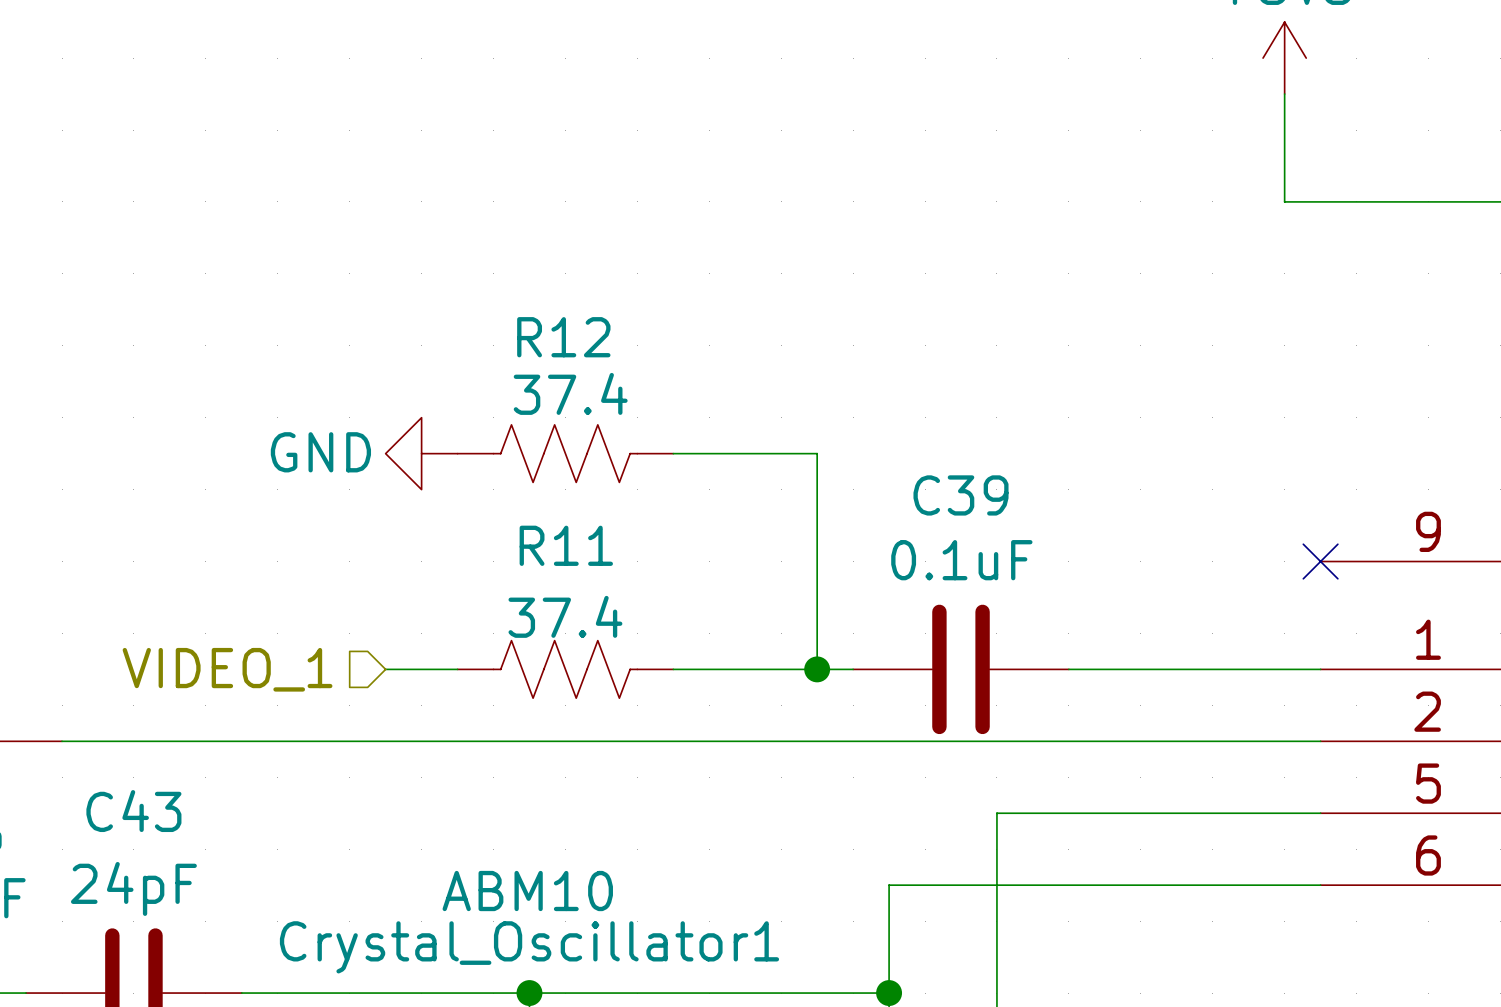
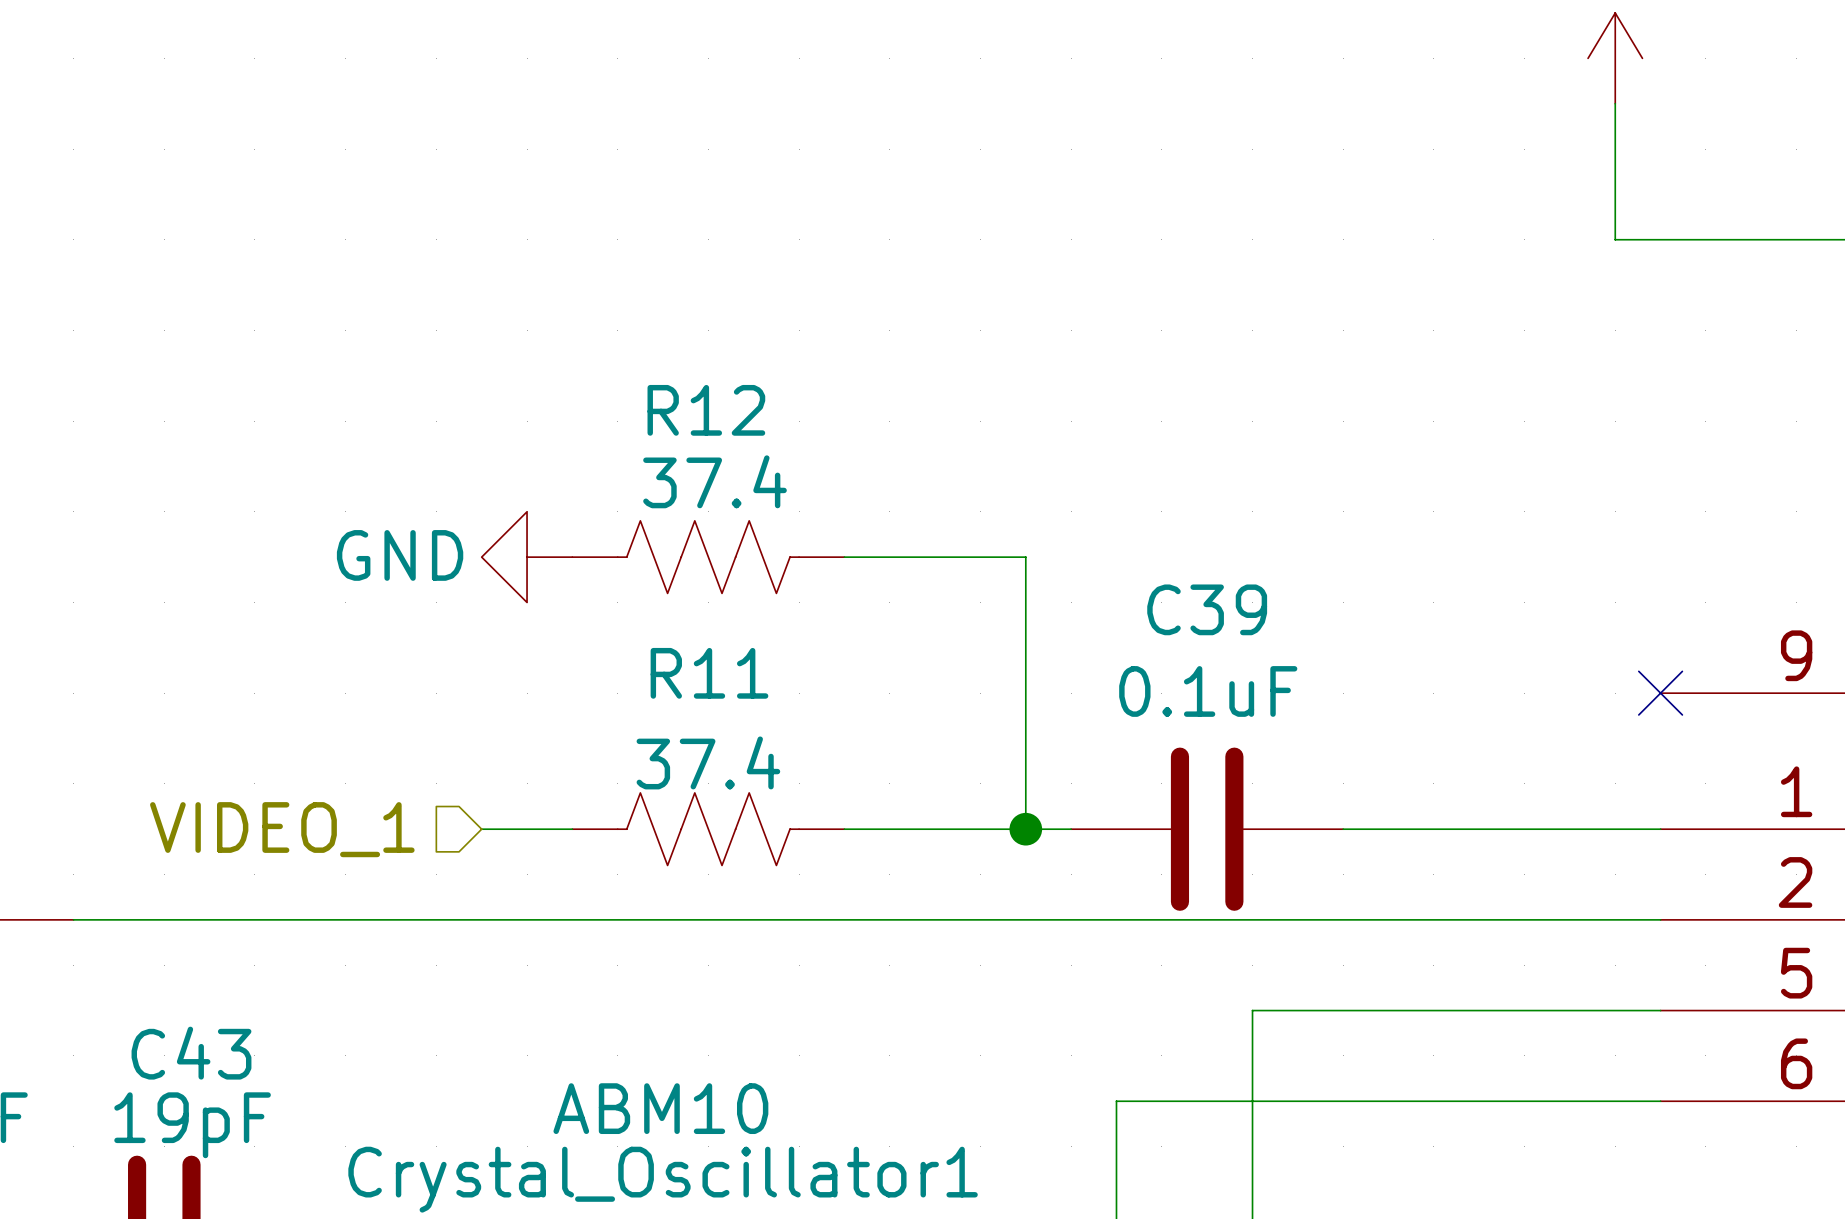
C43 name position: C43 (133, 811) -> C43 (191, 1053)
C43 value: 24pF (133, 888) -> 19pF (192, 1125)

